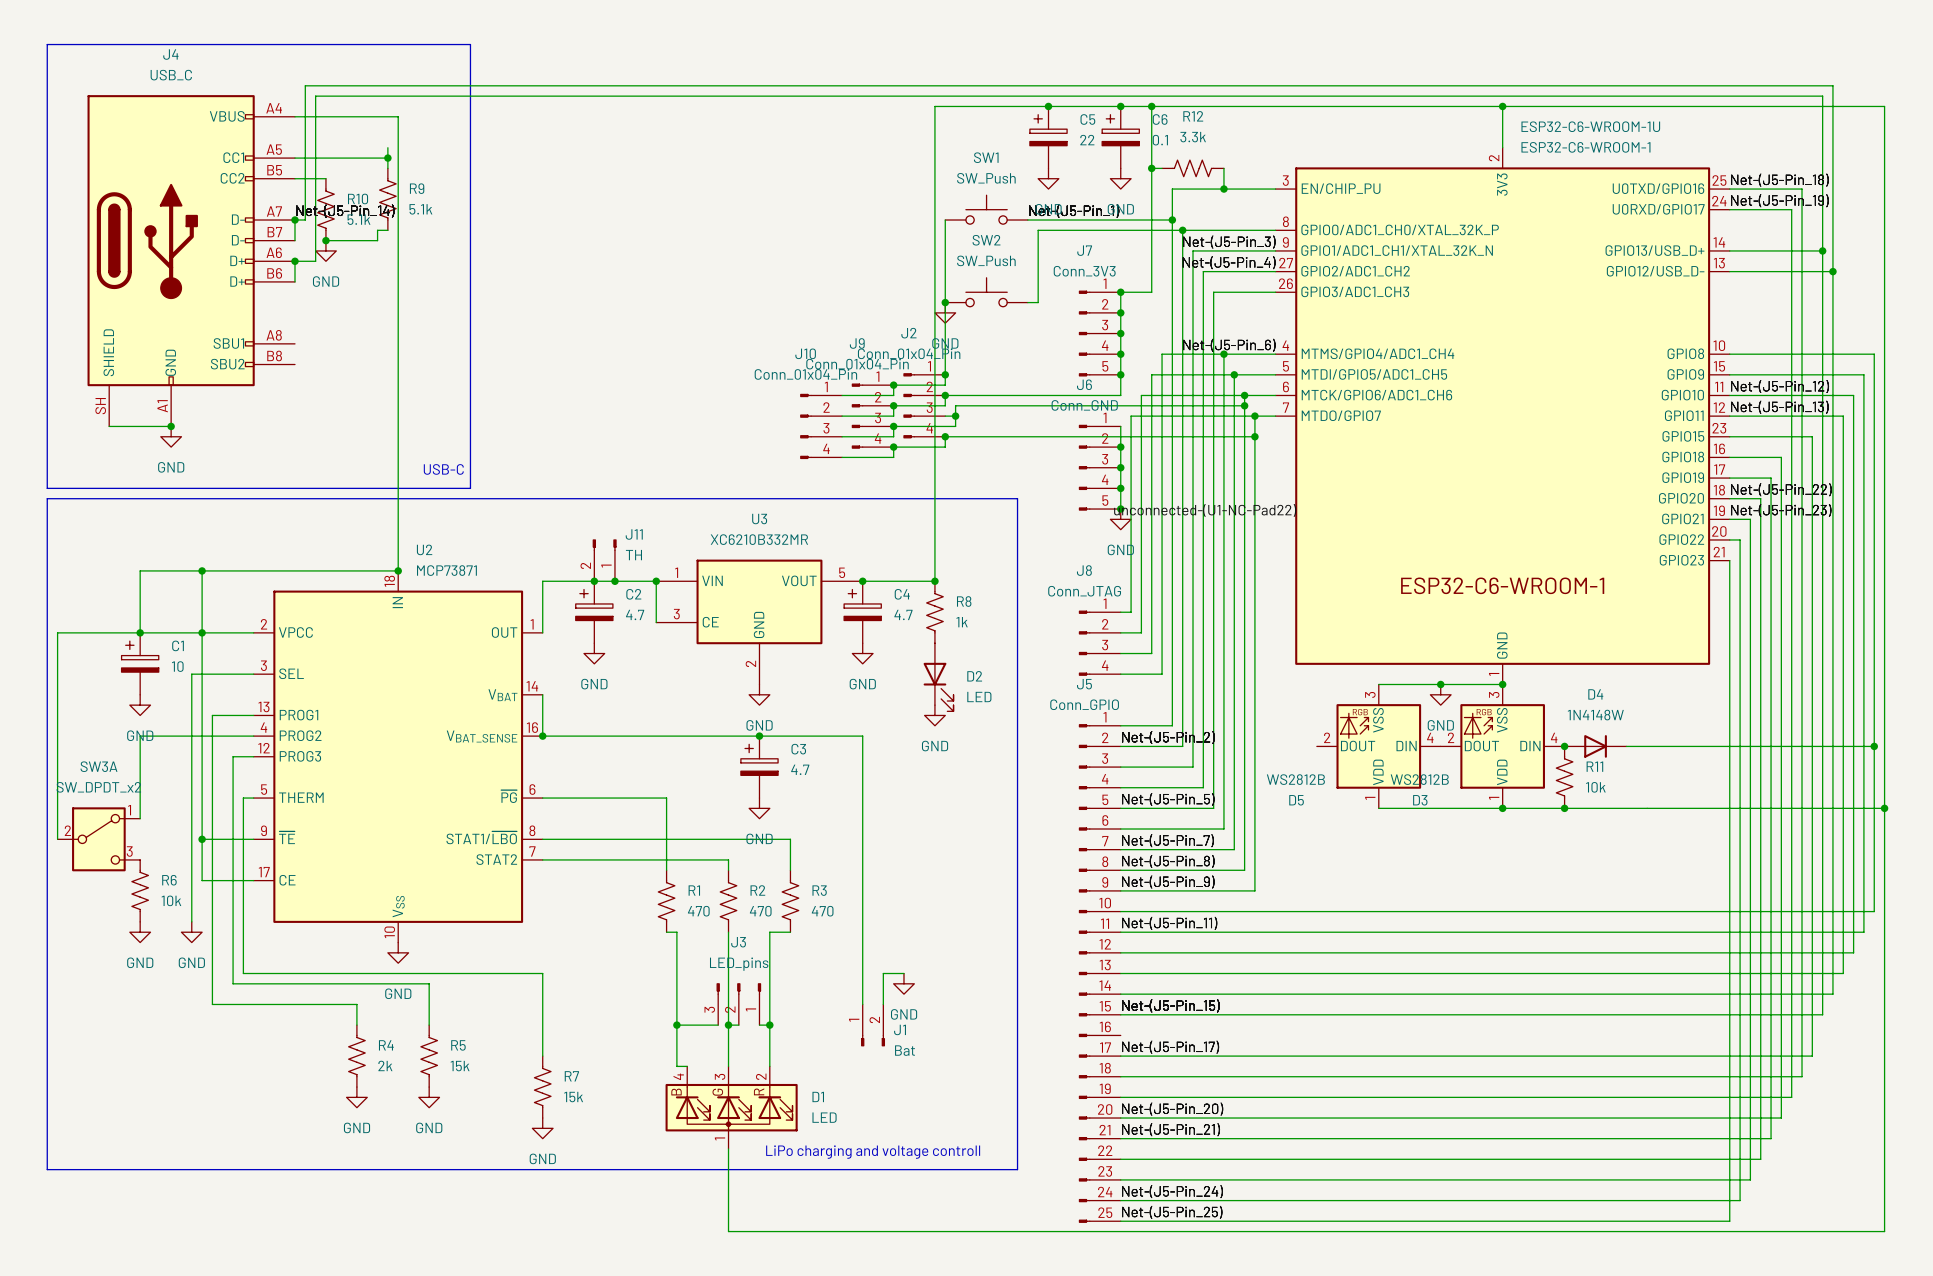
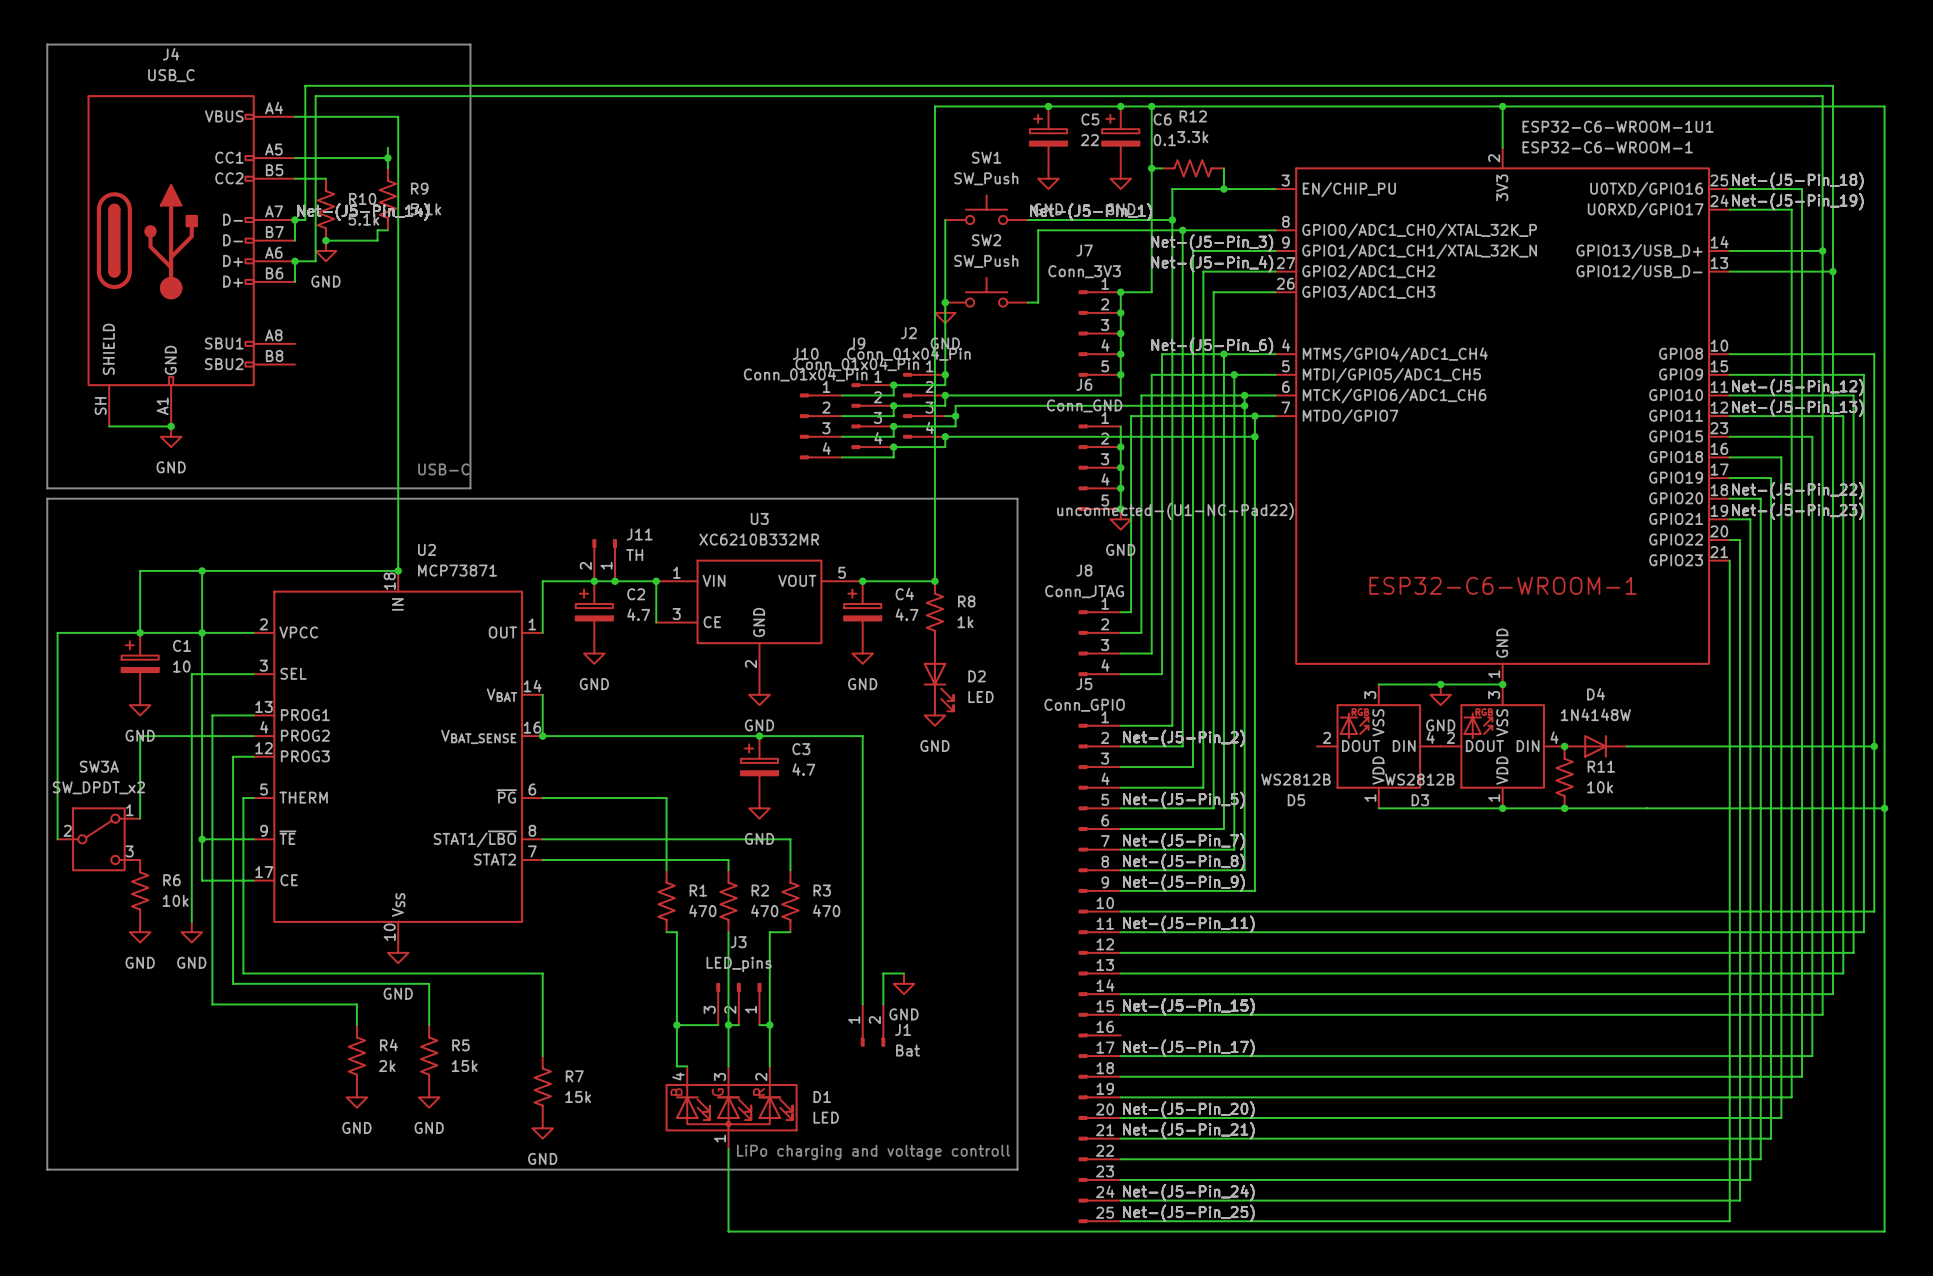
ESP32-C6-WROOM-1U name: ESP32-C6-WROOM-1U (1590, 126) -> ESP32-C6-WROOM-1U1 (1617, 126)

